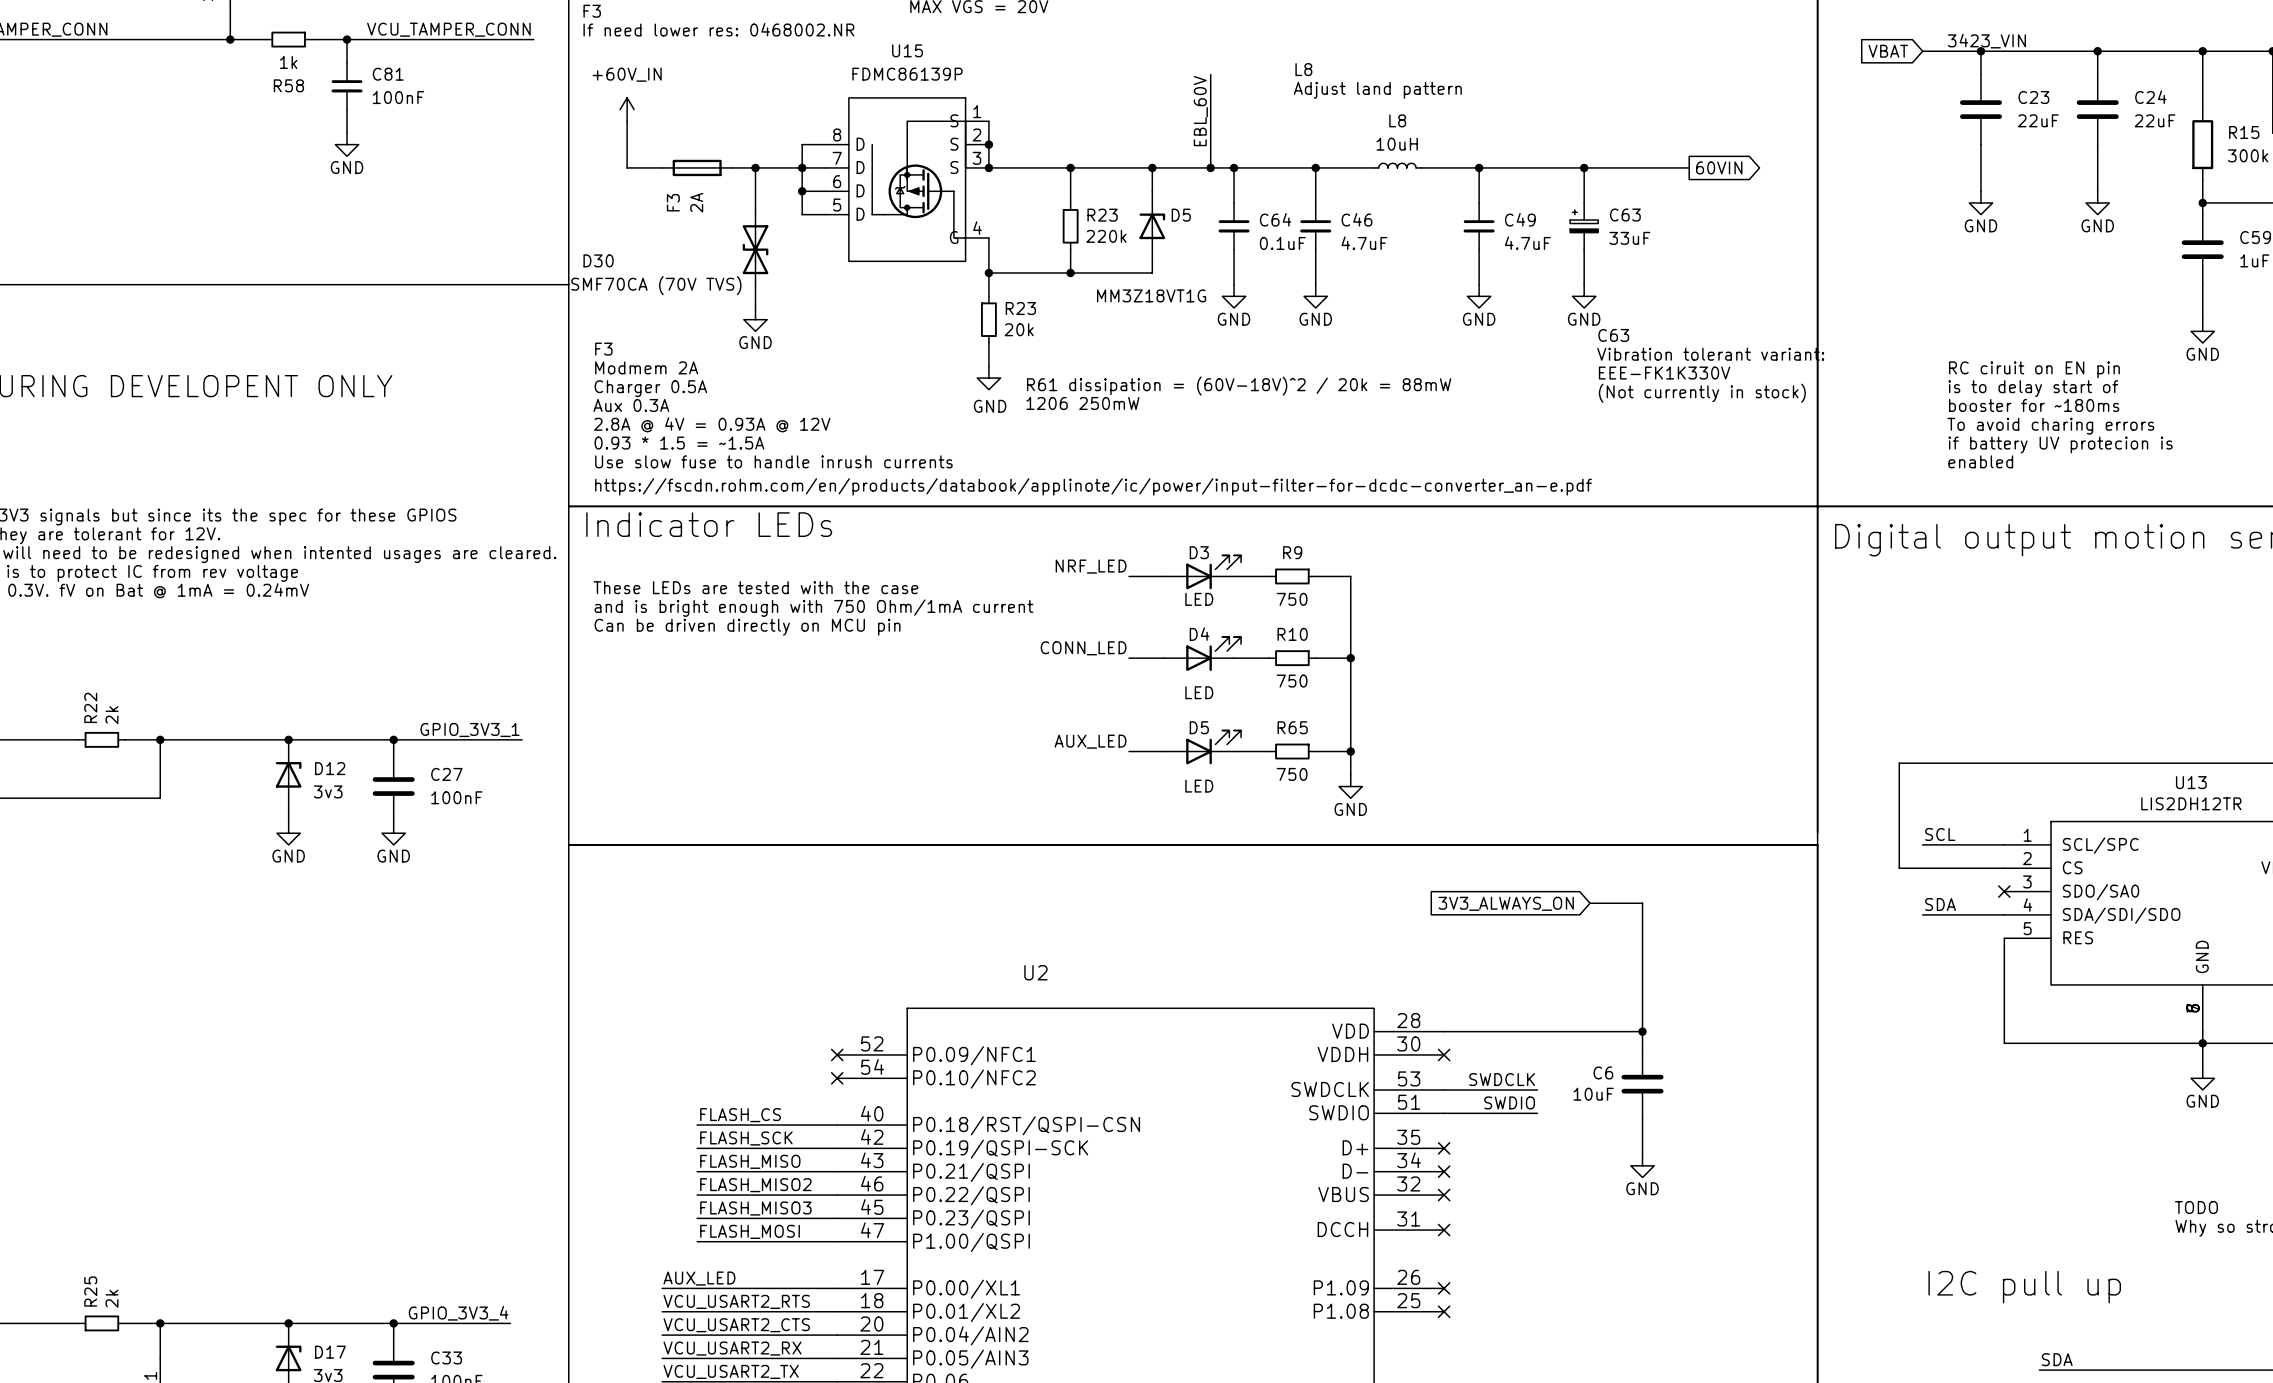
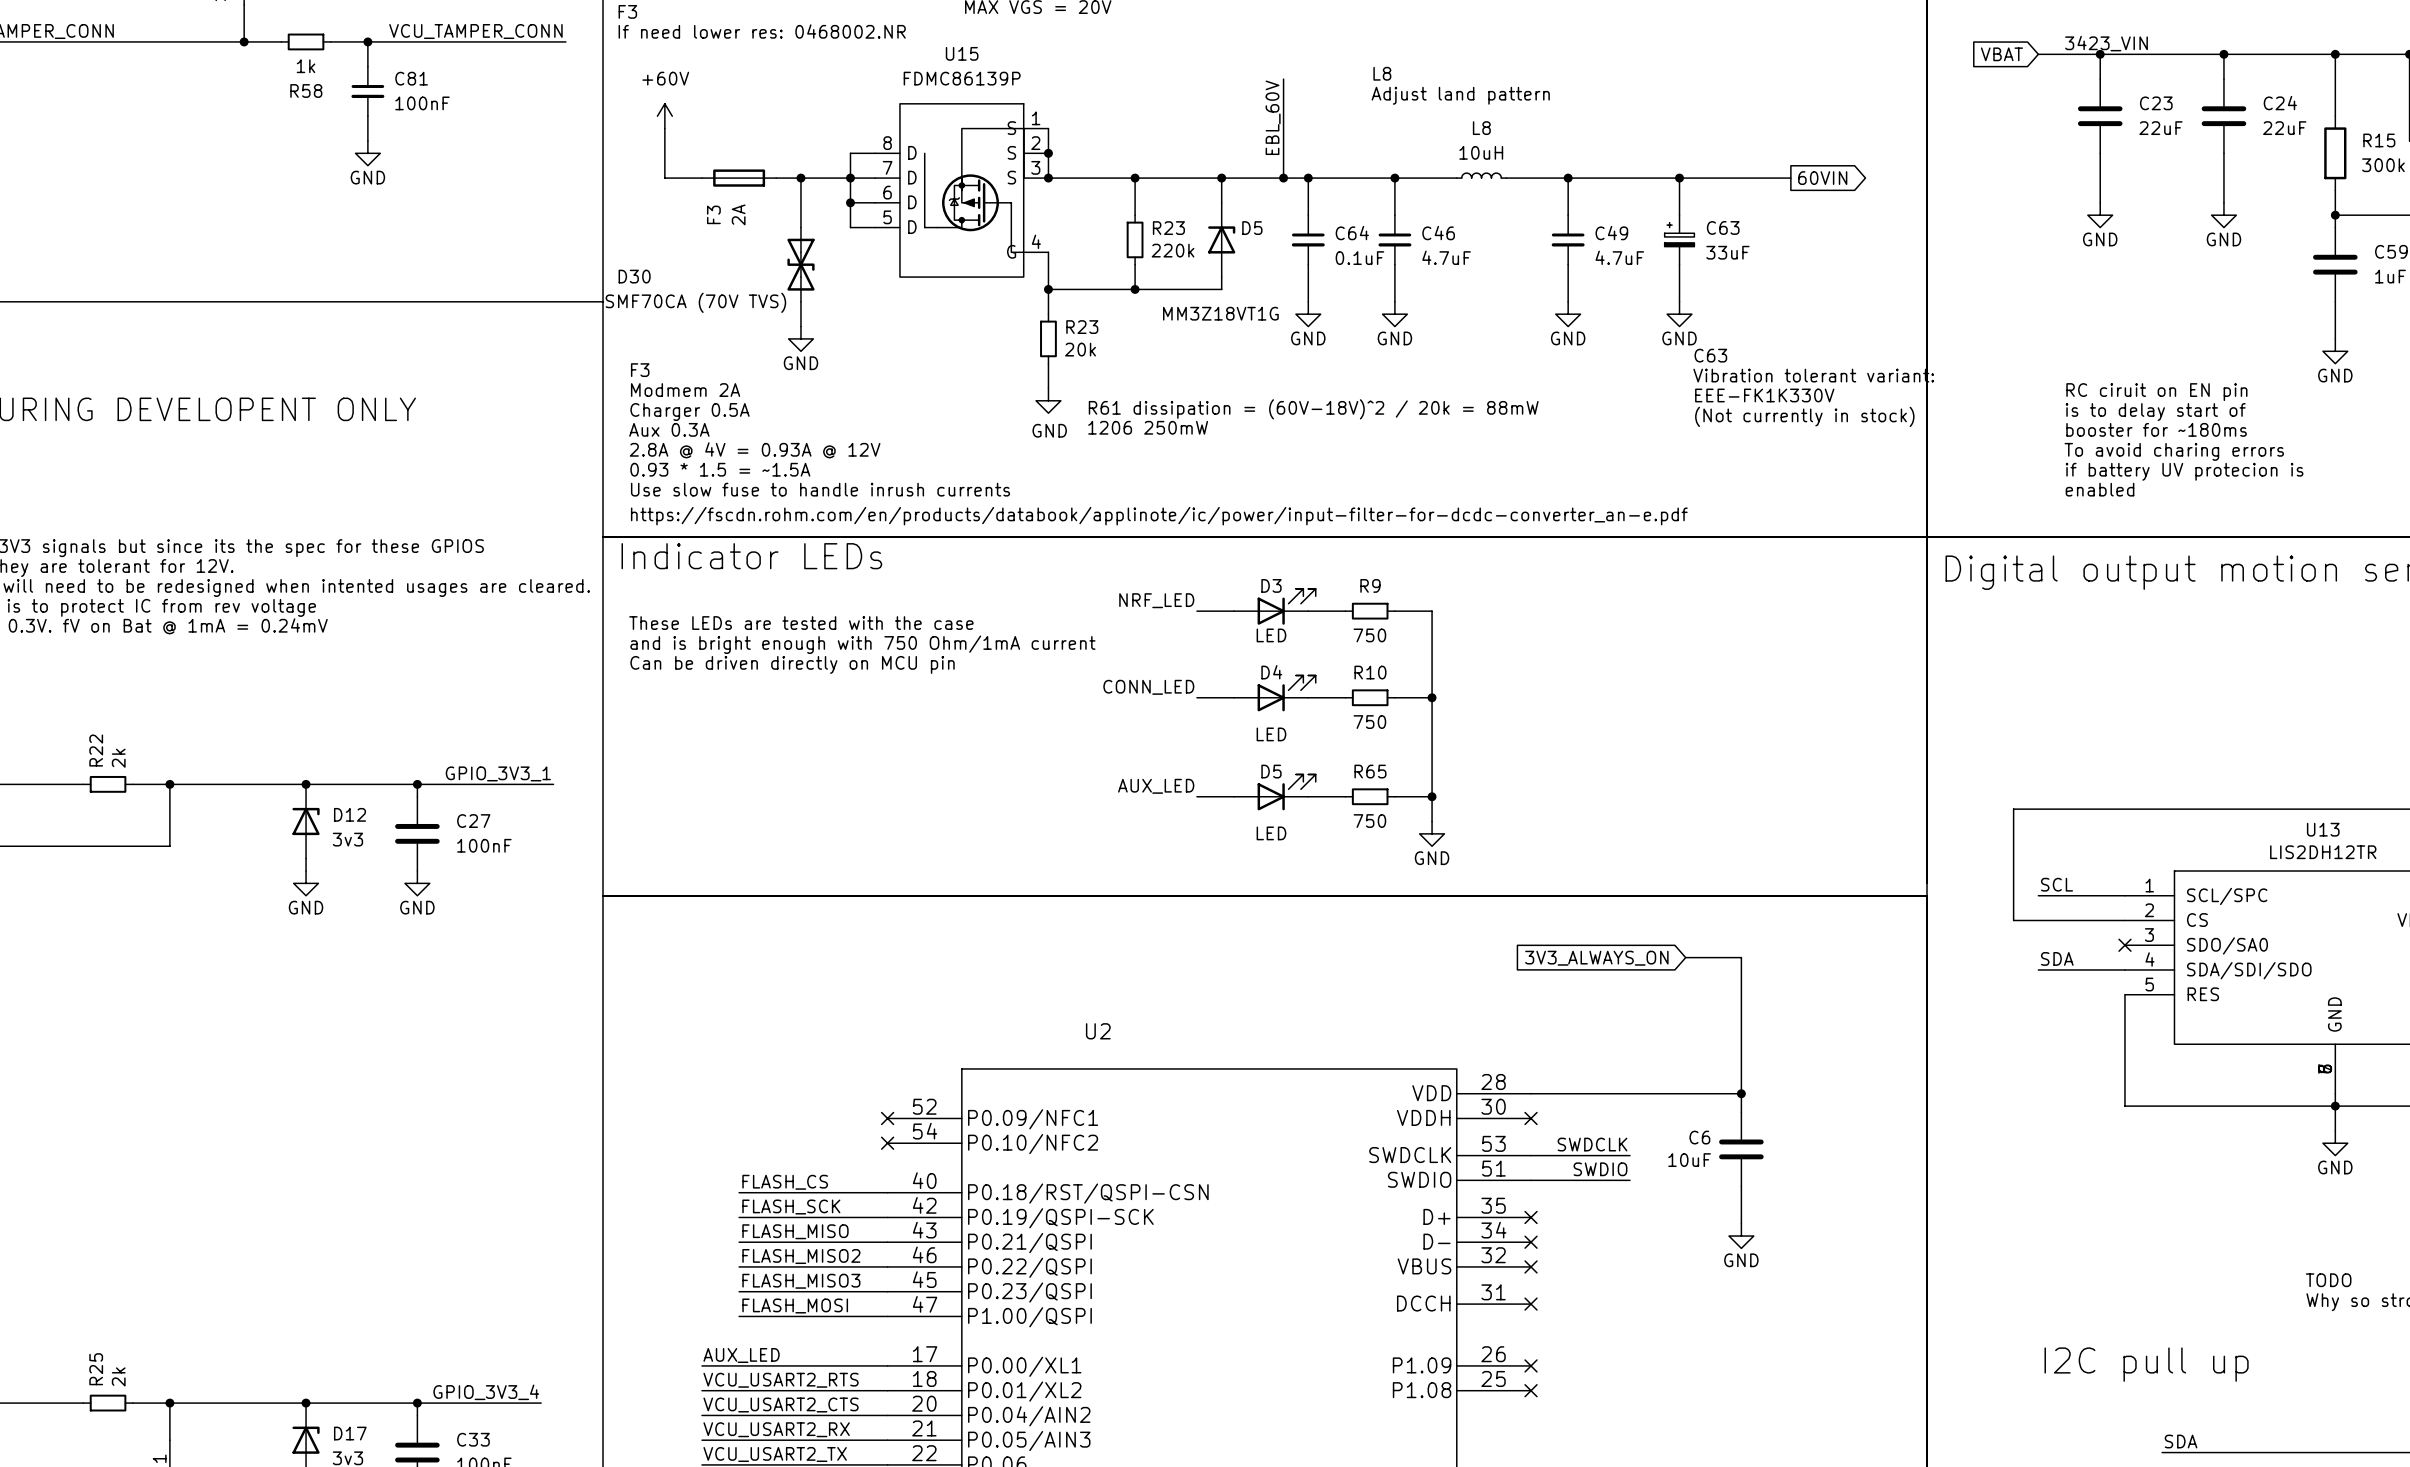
power symbol: +60V_IN (627, 109) -> +60V (664, 116)

